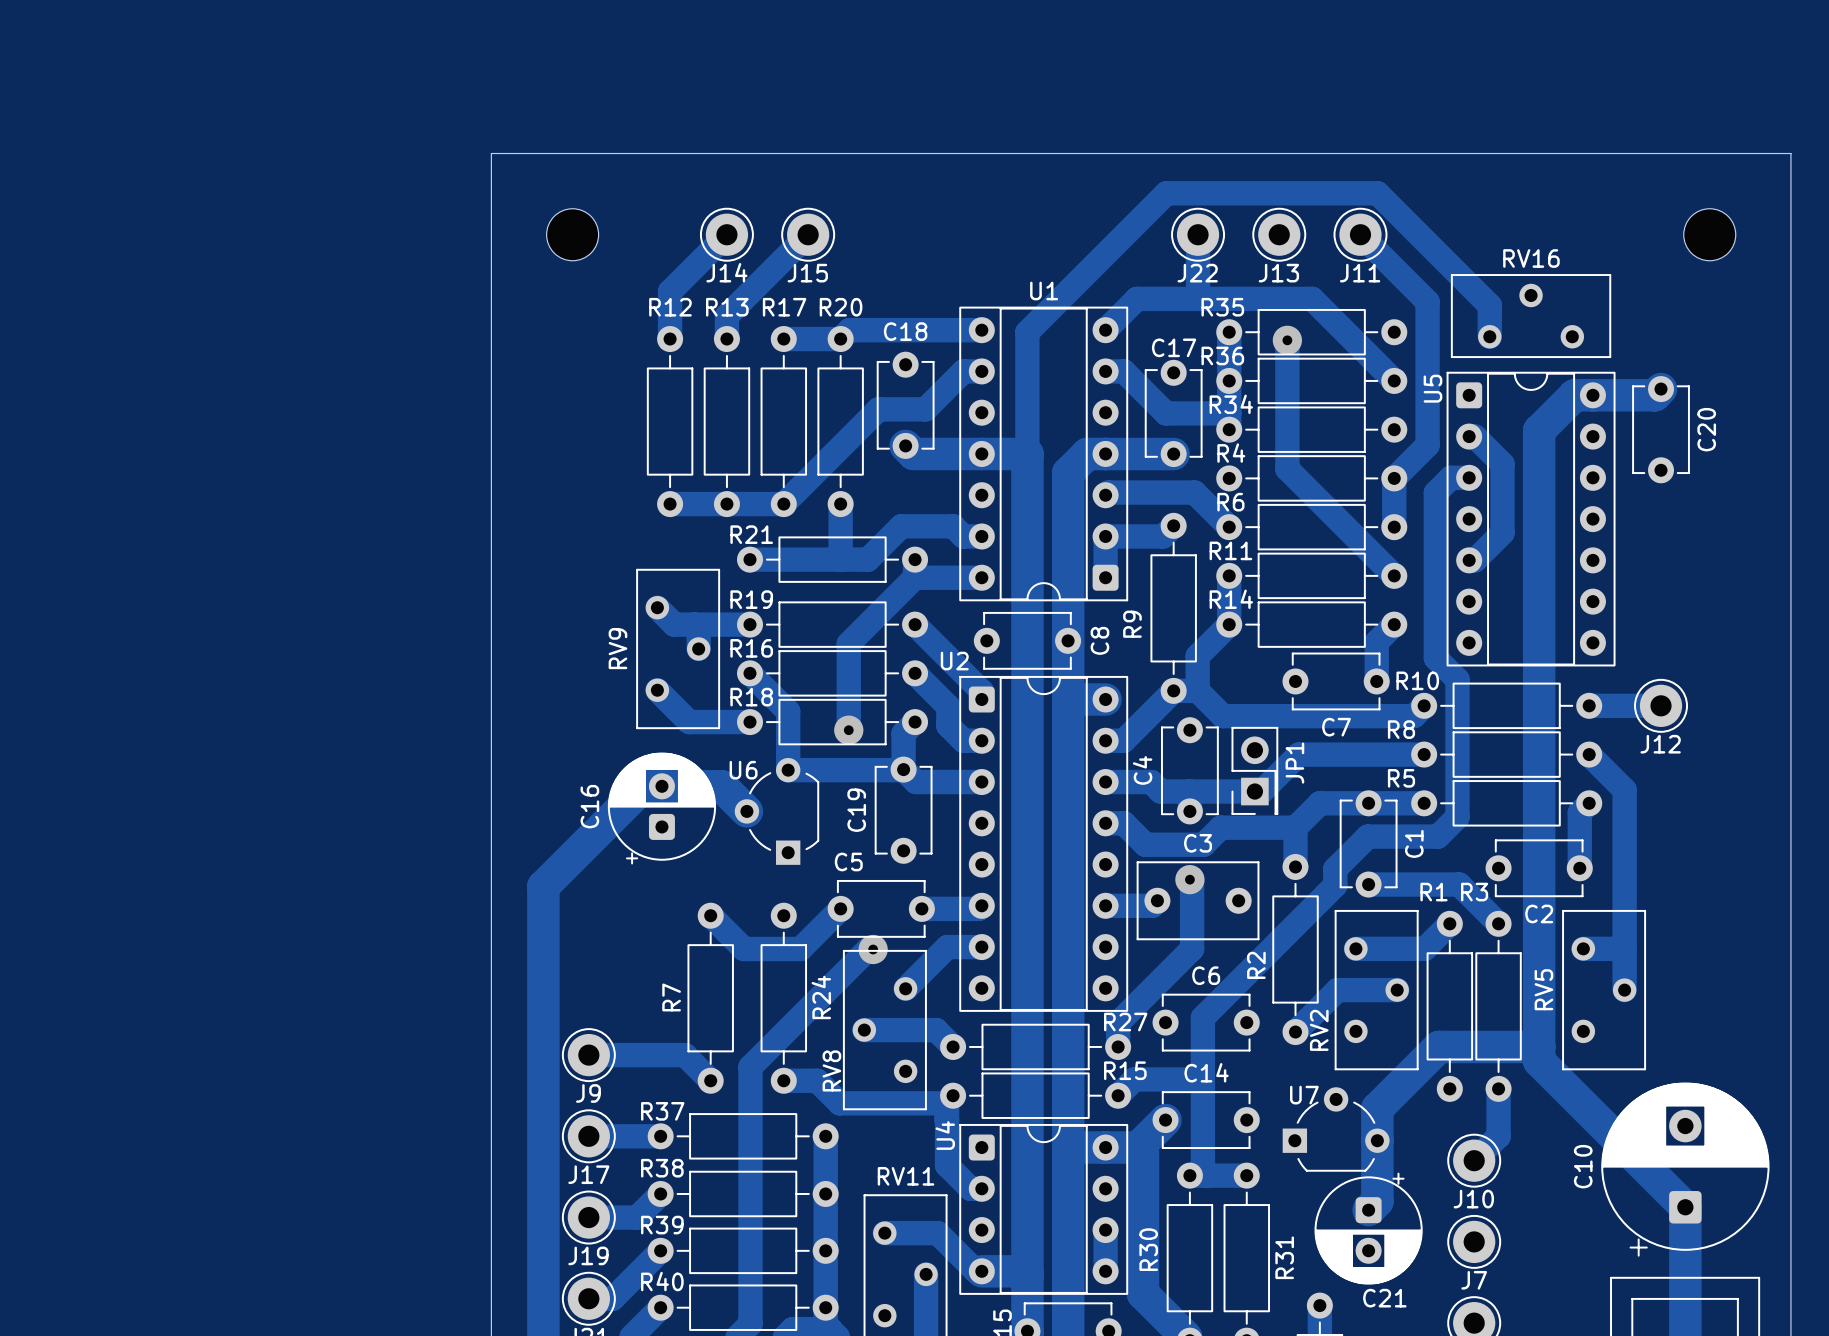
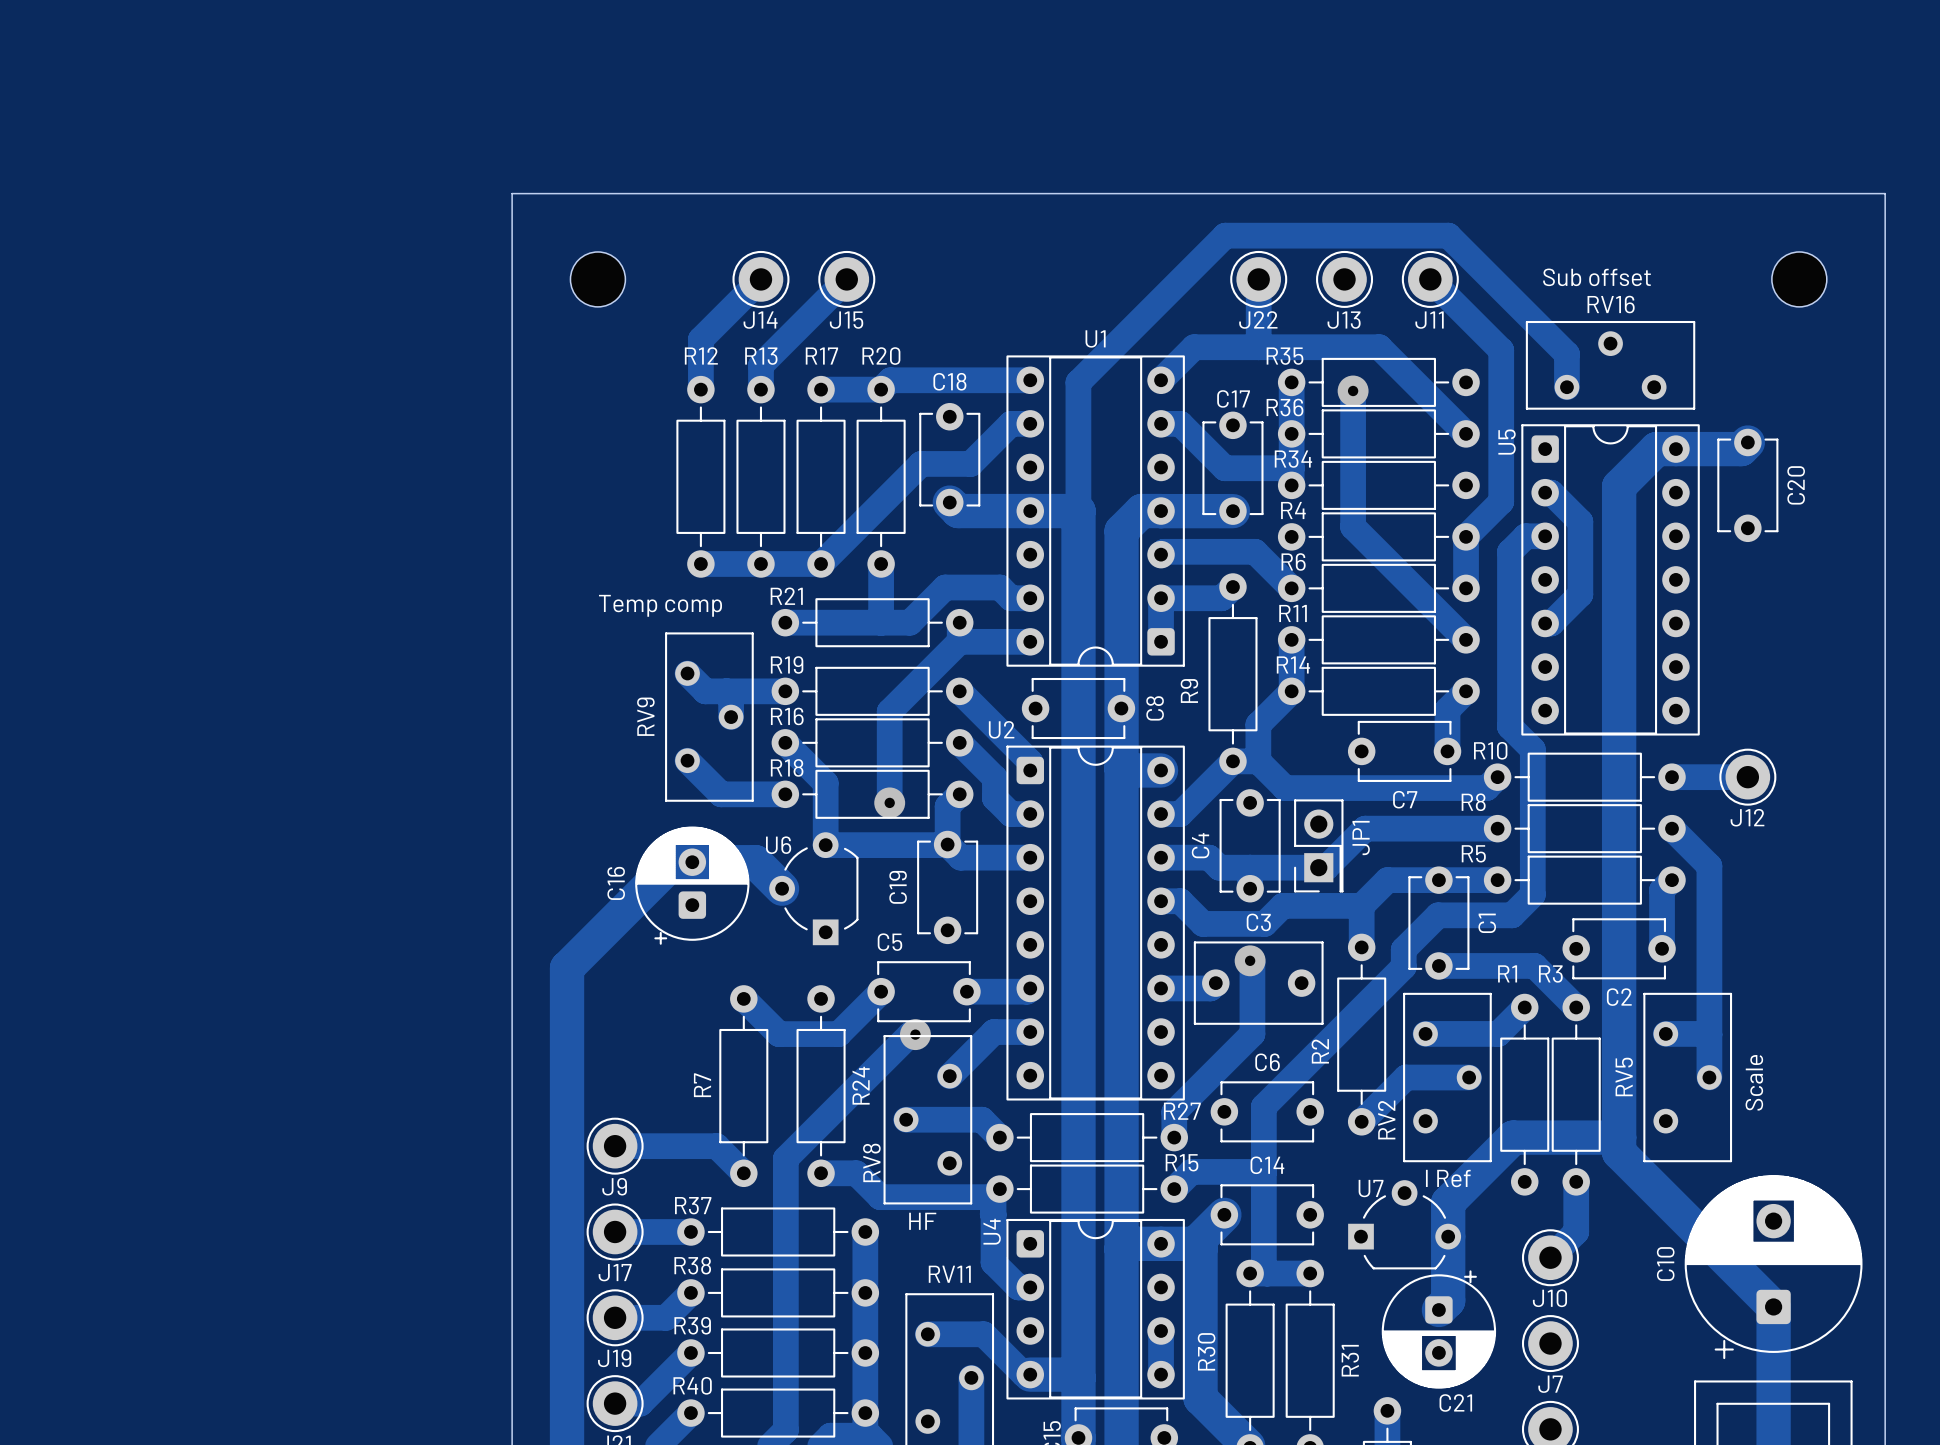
text: none -> Sub offset (1597, 277)
text: none -> Temp comp (660, 605)
text: none -> Scale (1754, 1082)
text: none -> I Ref (1448, 1178)
text: none -> HF (922, 1221)

